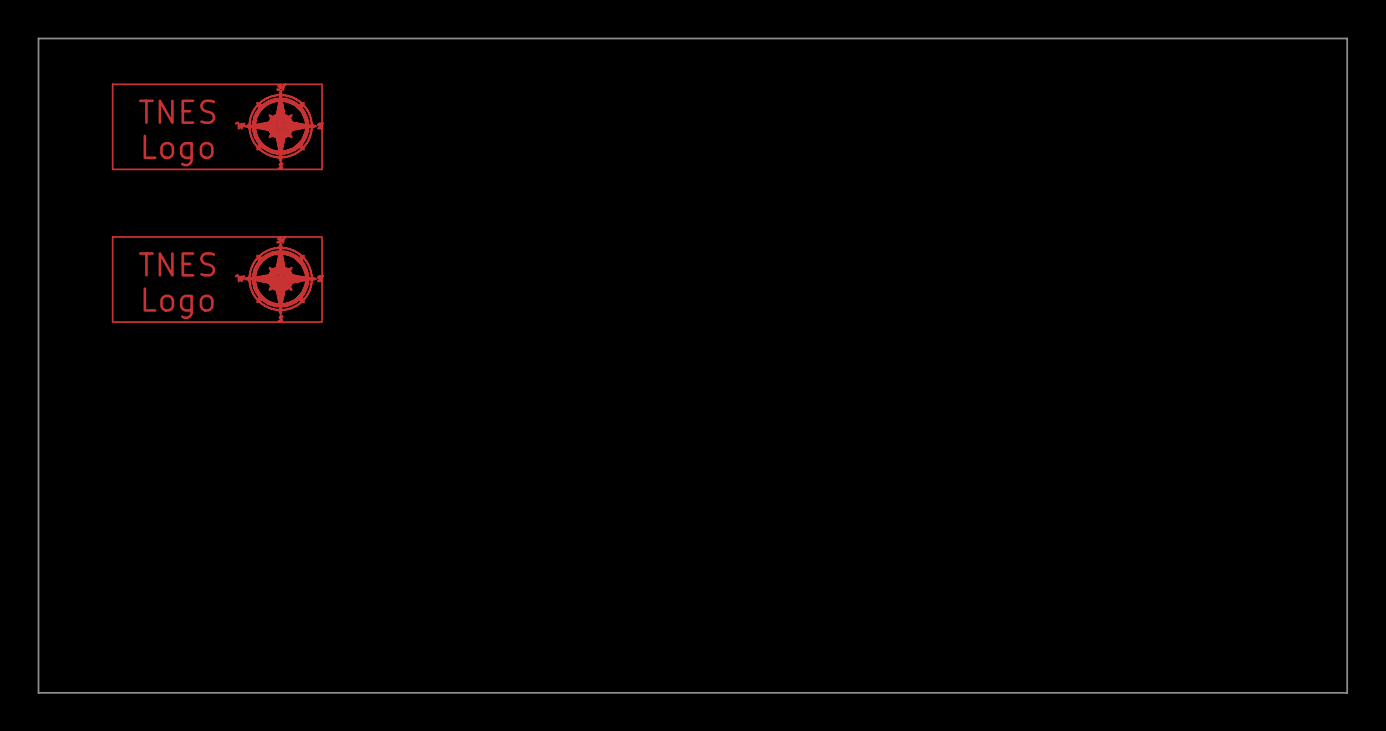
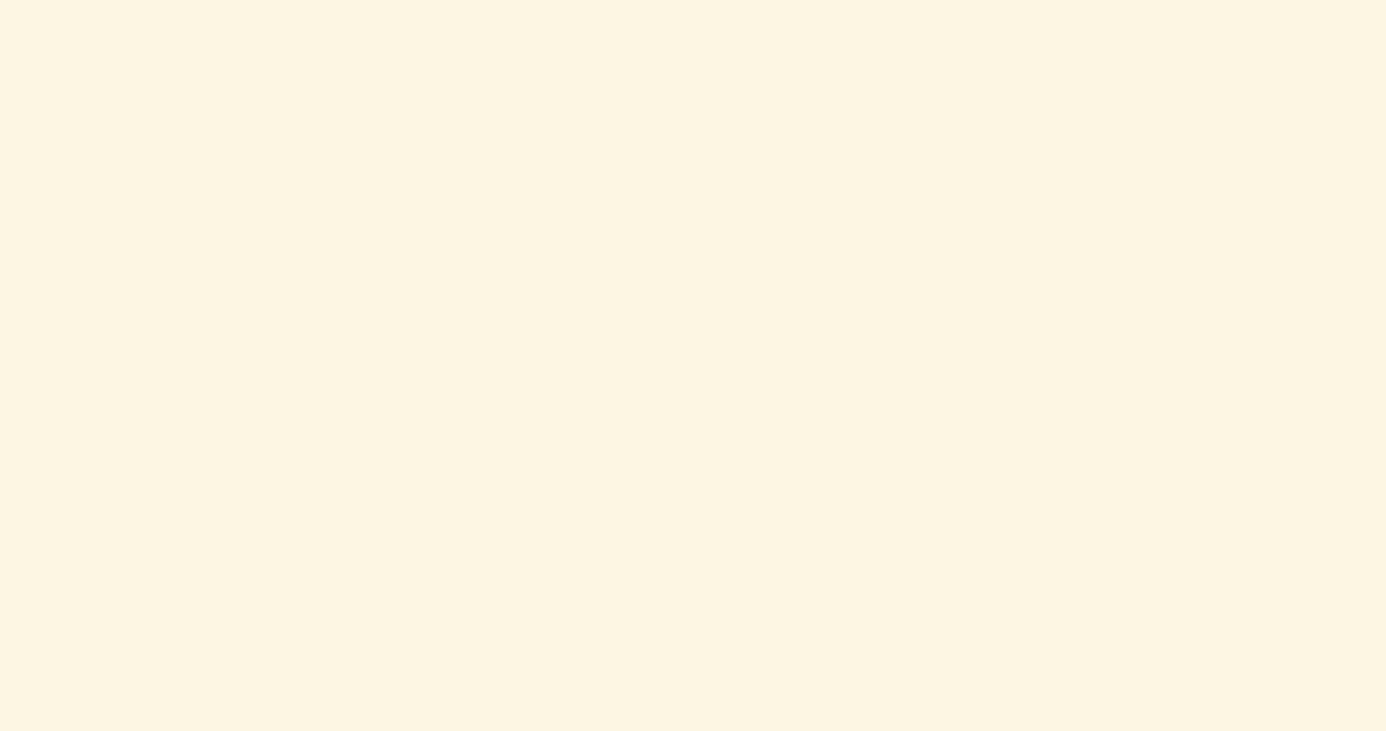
line: (38, 38) (1347, 38) (1347, 692) (38, 692) (38, 38) -> none
part: (217, 126) -> none
part: (217, 279) -> none

